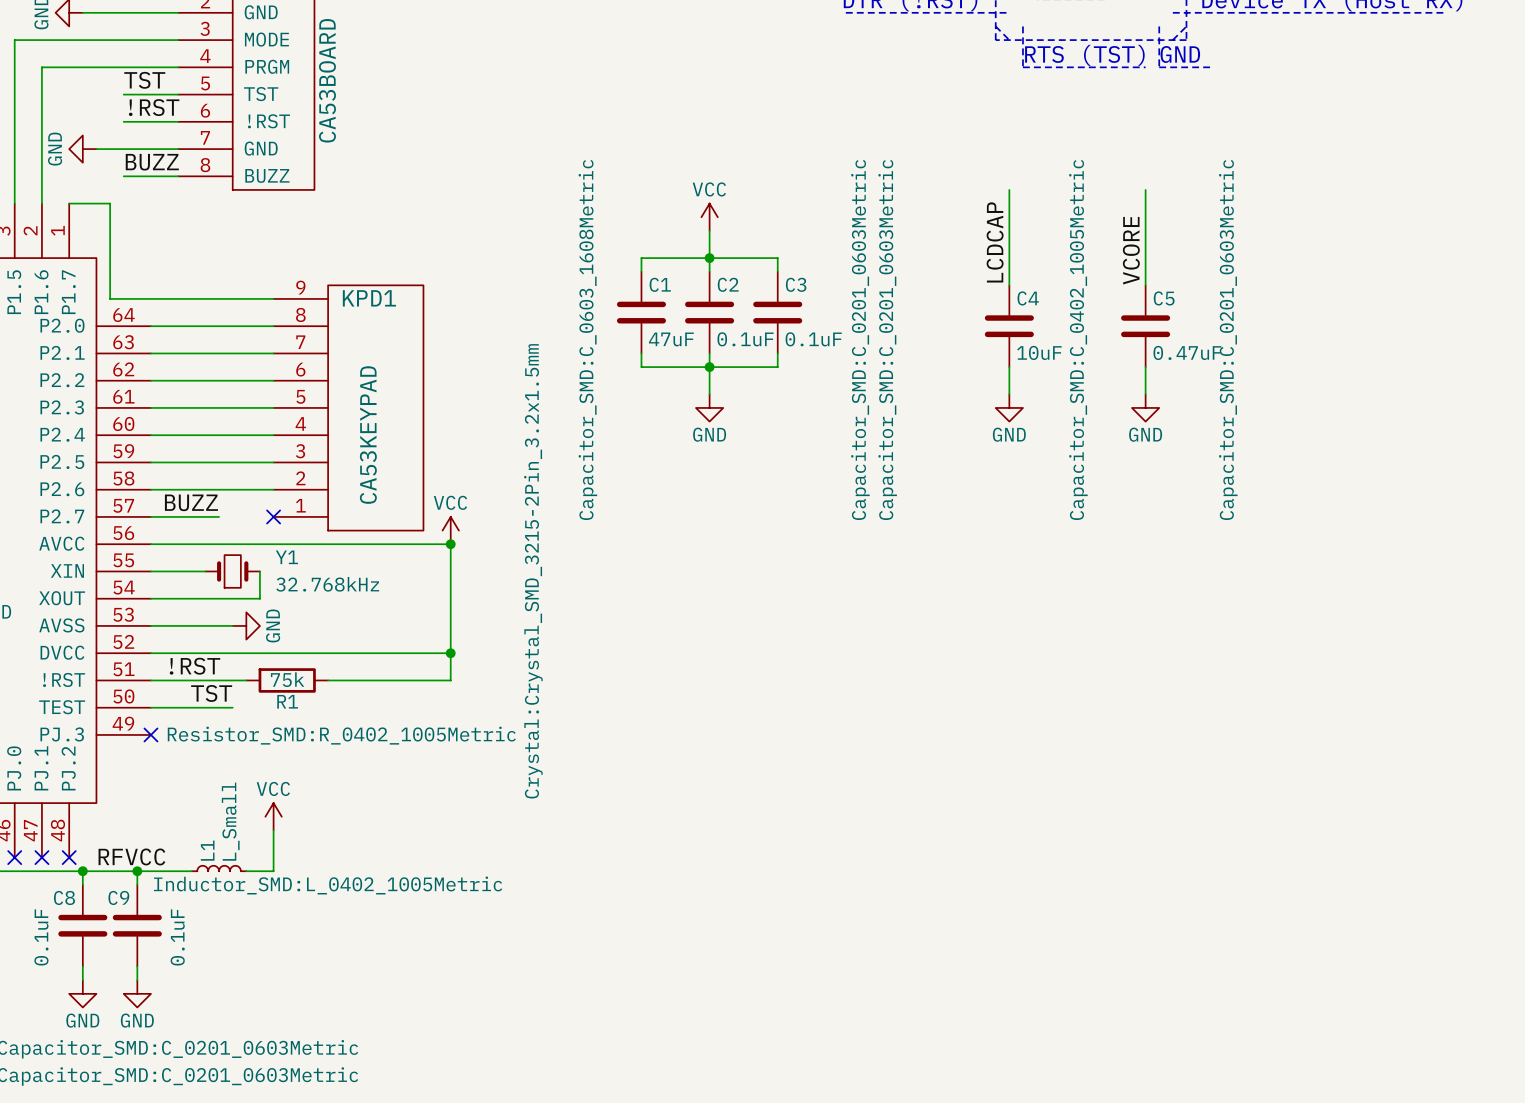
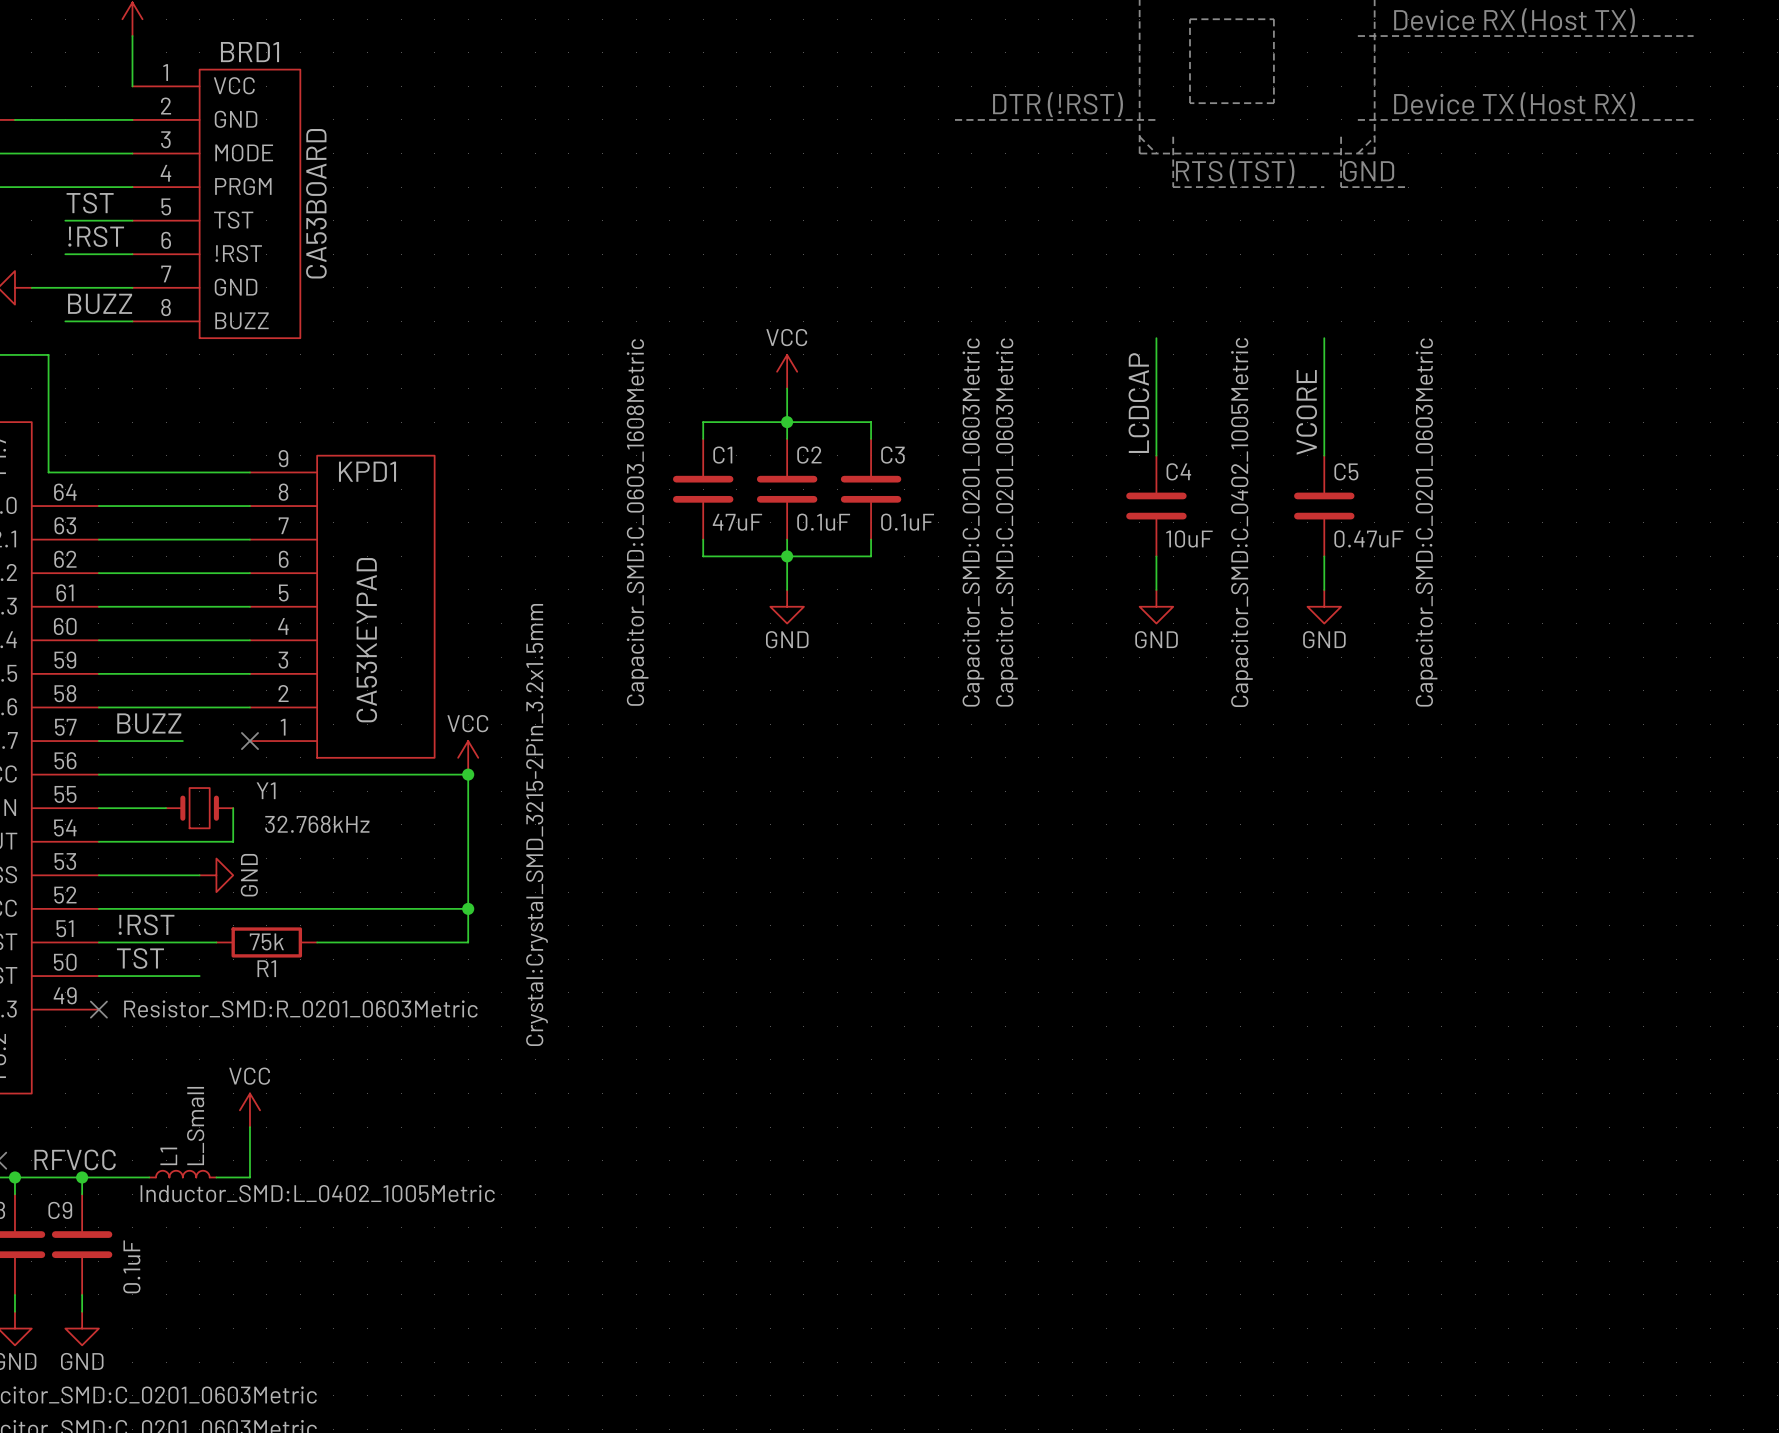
Y1 text position: Crystal:Crystal_SMD_3215-2Pin_3.2x1.5mm (533, 571) -> Crystal:Crystal_SMD_3215-2Pin_3.2x1.5mm (537, 824)
label position: TST (211, 693) -> TST (140, 958)
R1 text: Resistor_SMD:R_0402_1005Metric (341, 735) -> Resistor_SMD:R_0201_0603Metric (300, 1008)

